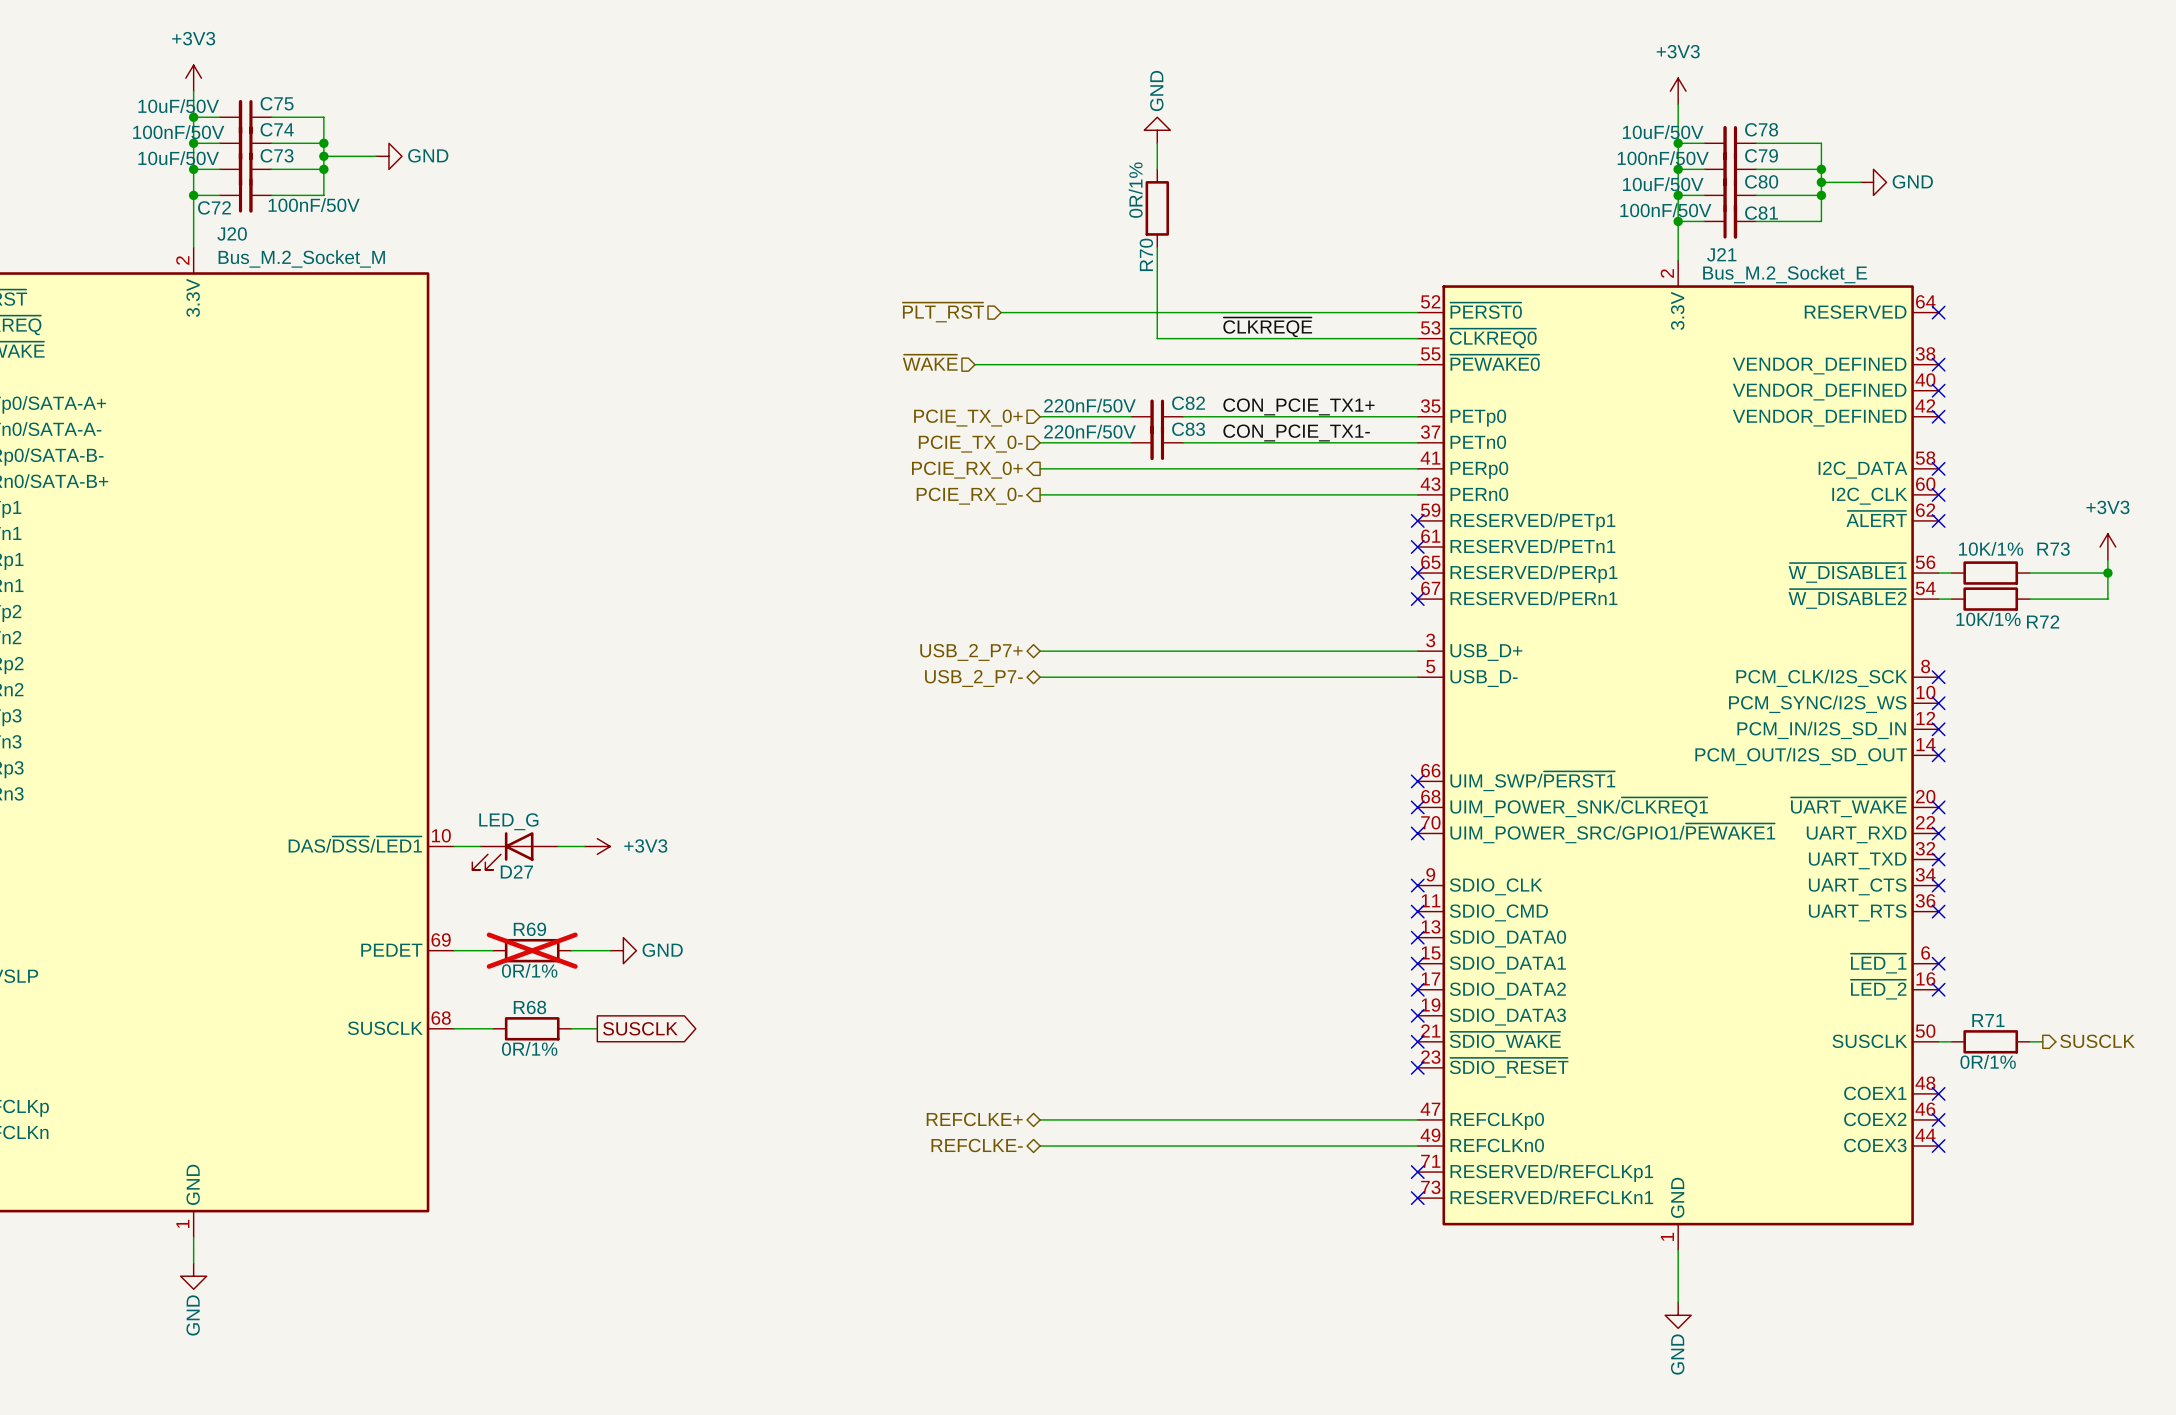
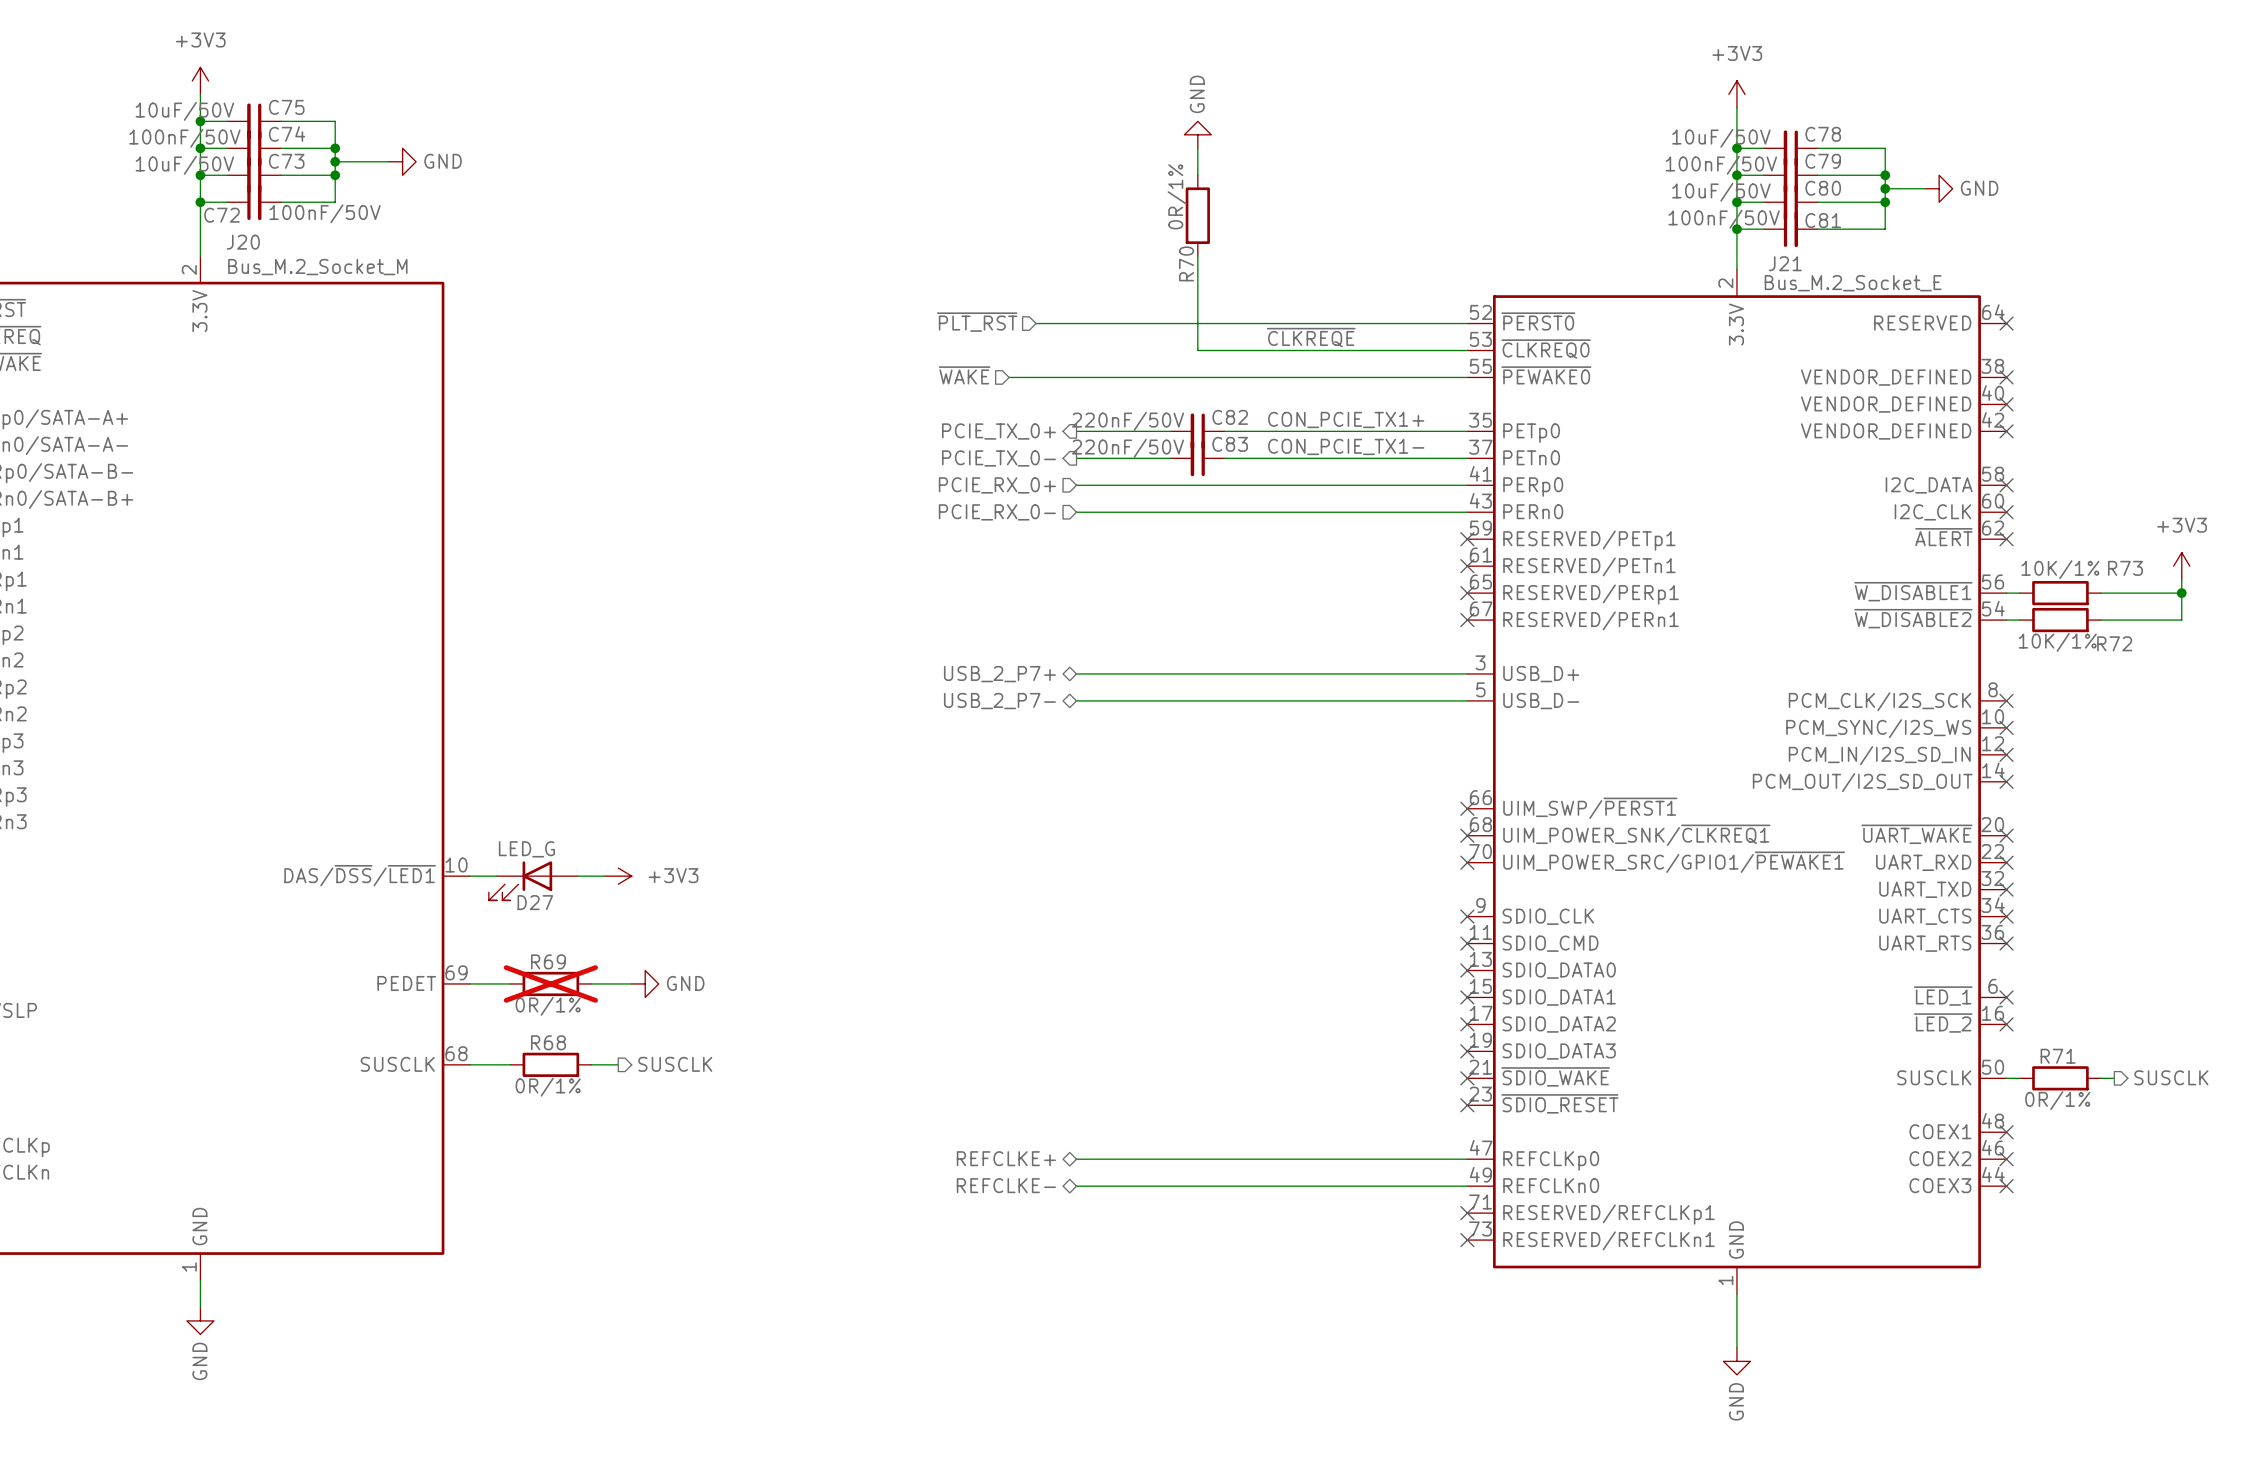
hierarchical label shape: input (968, 418) -> output (998, 431)
hierarchical label shape: input (970, 444) -> output (998, 458)
hierarchical label shape: output (967, 470) -> input (997, 485)
hierarchical label shape: output (969, 496) -> input (997, 512)
global label: SUSCLK (640, 1028) -> none
hierarchical label: none -> SUSCLK (675, 1064)

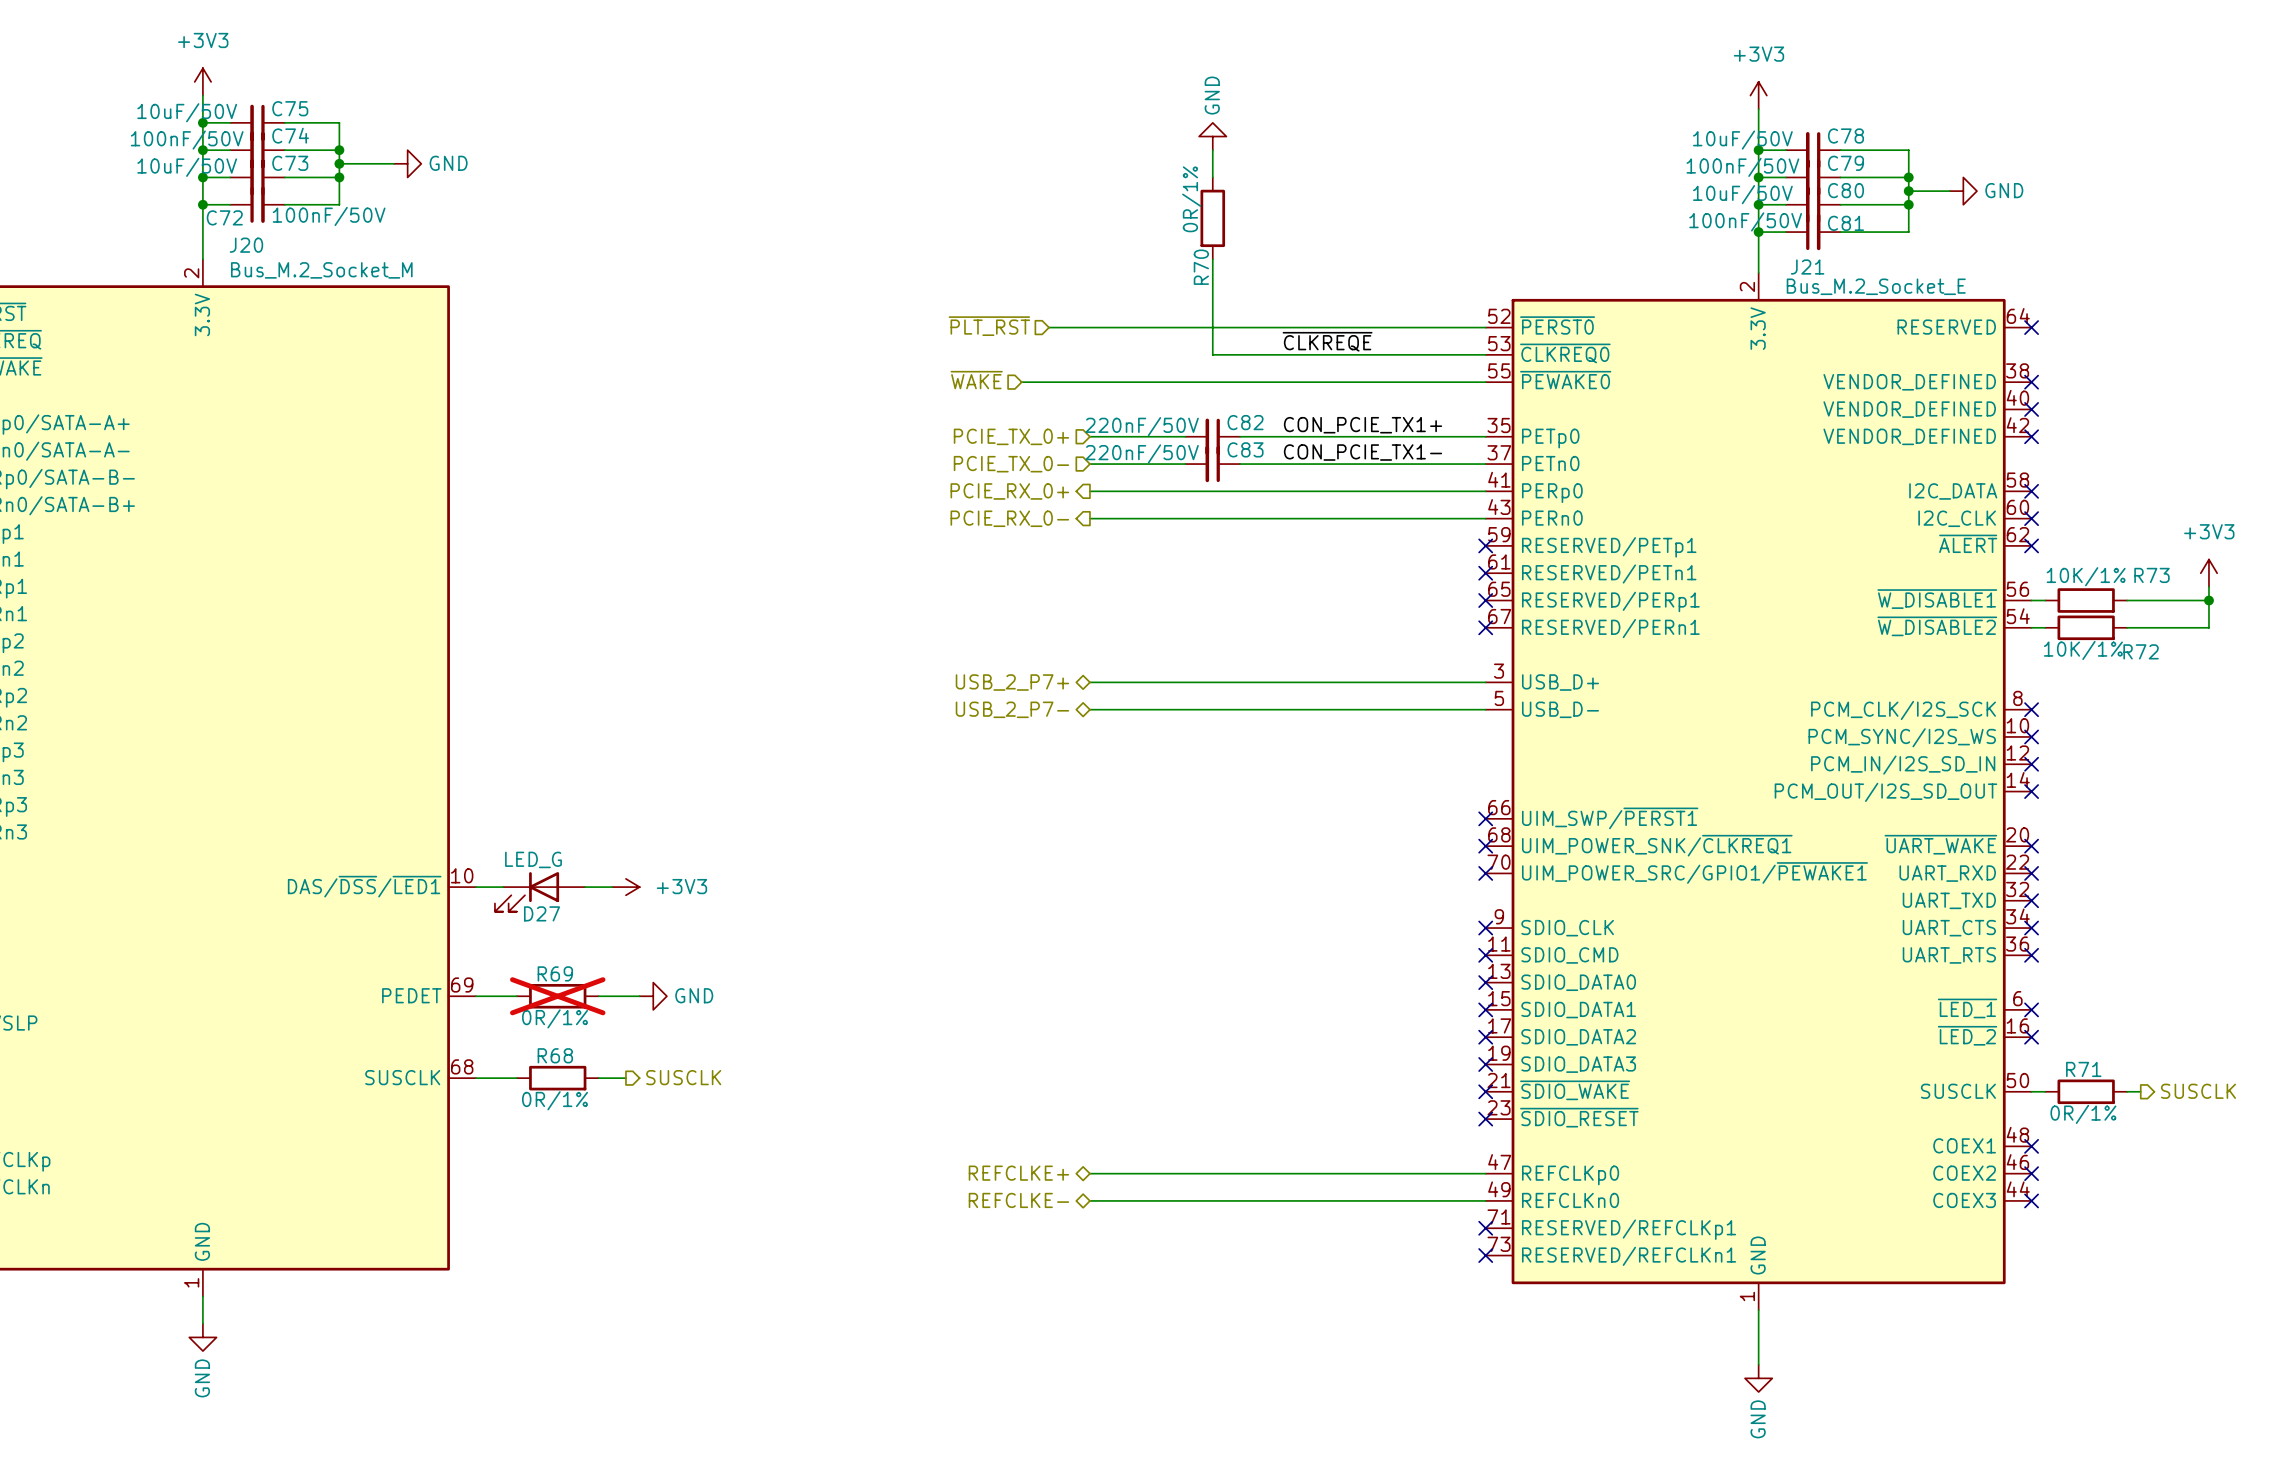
hierarchical label shape: output (998, 431) -> input (1011, 436)
hierarchical label shape: output (998, 458) -> input (1011, 464)
hierarchical label shape: input (997, 485) -> output (1009, 491)
hierarchical label shape: input (997, 512) -> output (1009, 518)

